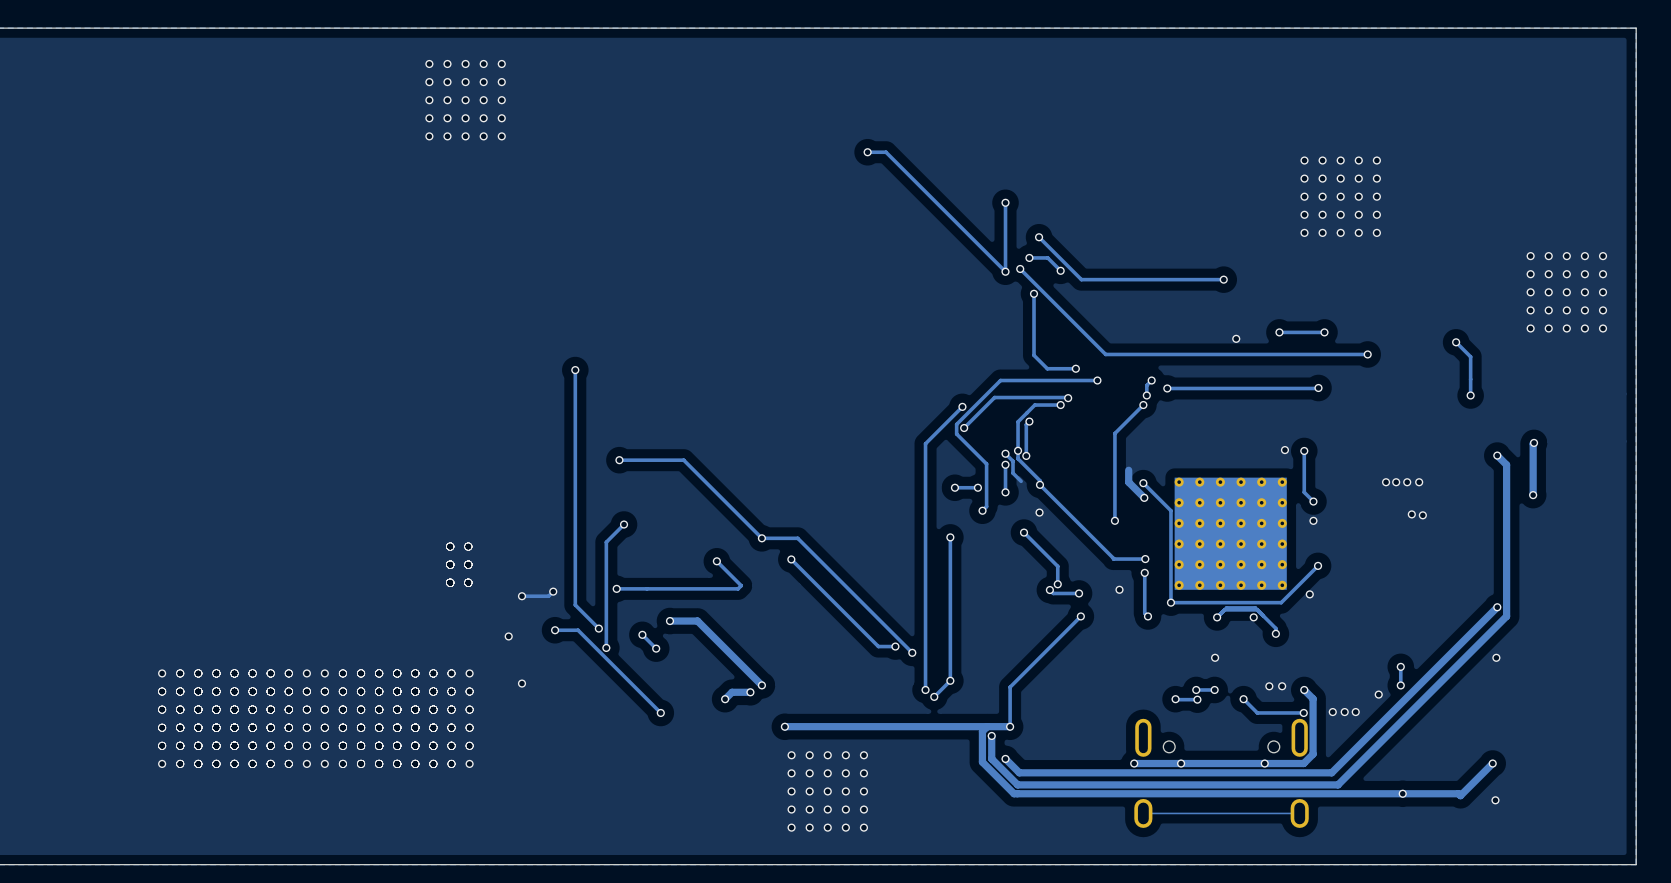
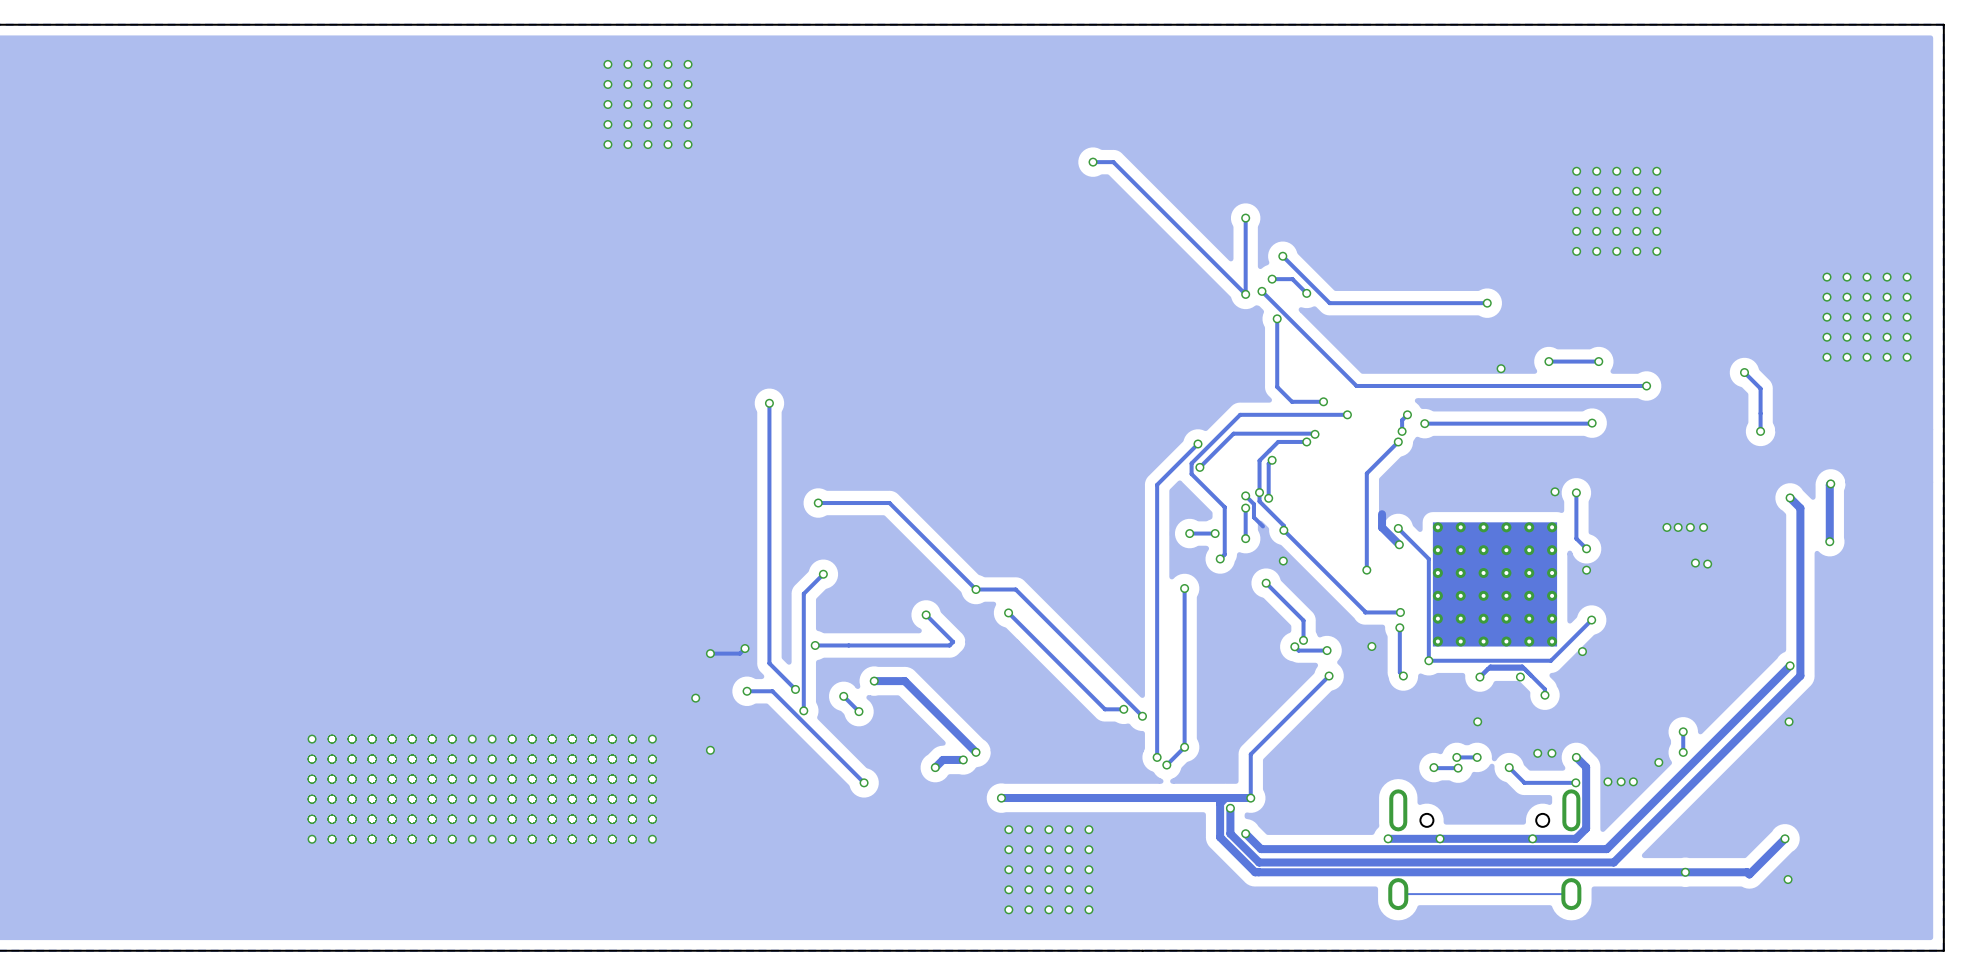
via: (450, 546) -> none
via: (468, 546) -> none
via: (450, 564) -> none
via: (468, 564) -> none
via: (450, 582) -> none
via: (468, 582) -> none

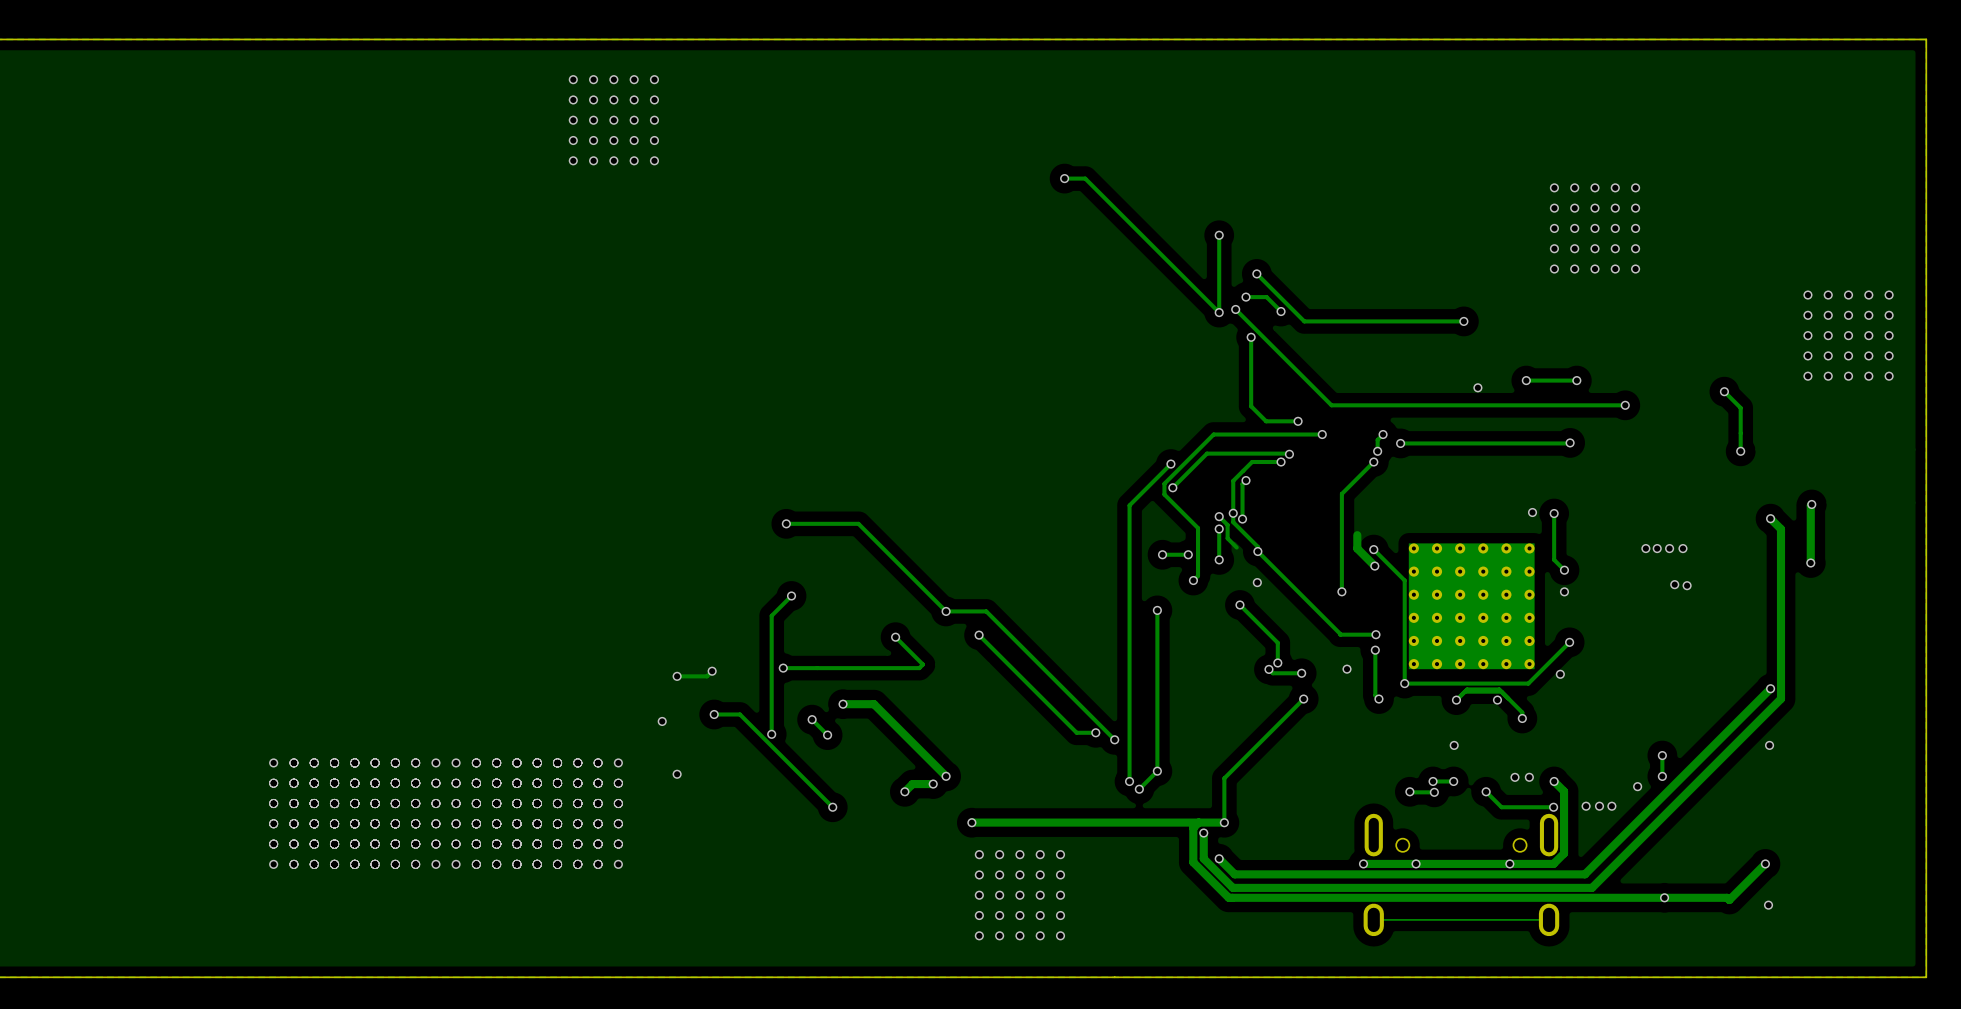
track: (769, 403) (769, 663) (795, 689) -> none
via: (769, 403) -> none
via: (795, 689) -> none

